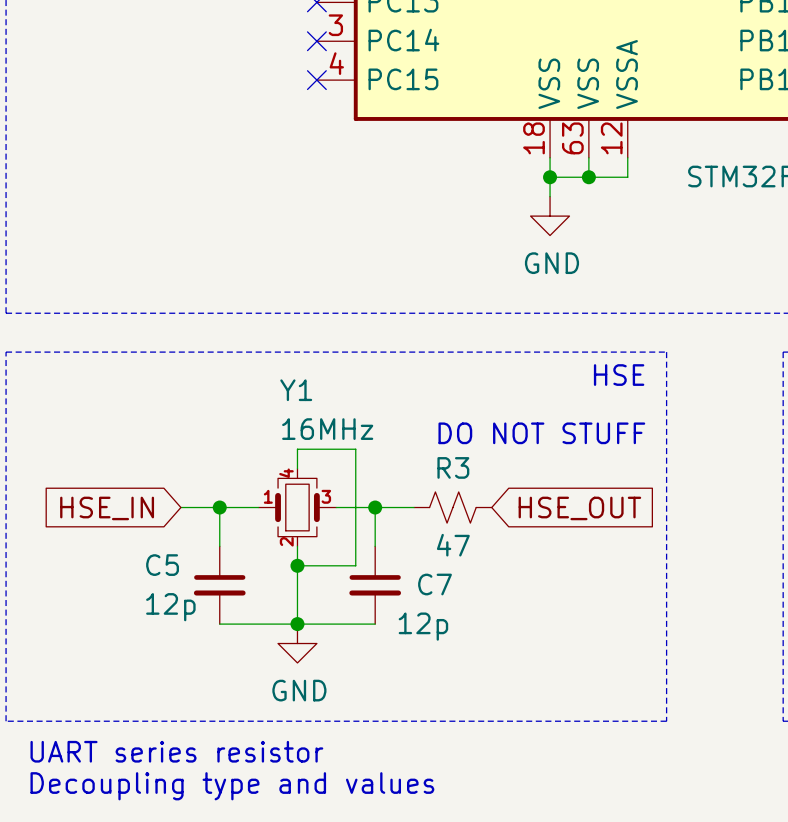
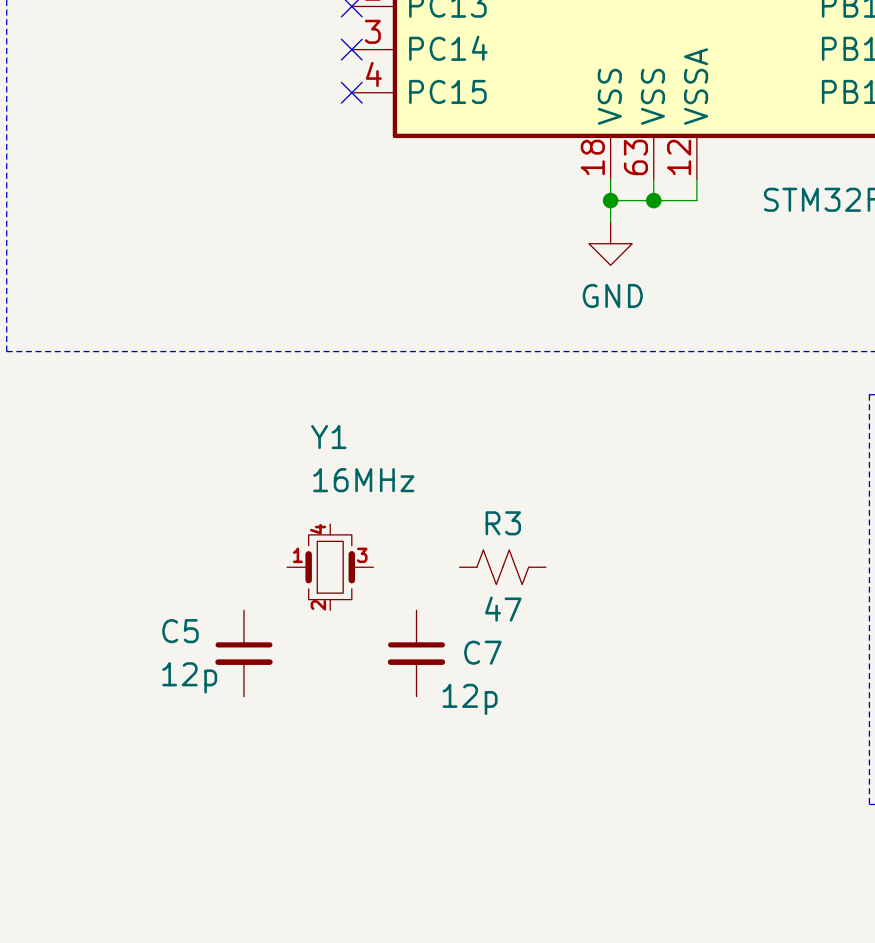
line: (6, 352) (6, 721) (666, 721) (666, 352) (6, 352) -> none
text: HSE (619, 375) -> none
text: DO NOT STUFF (541, 433) -> none
wire: (297, 468) (297, 449) (355, 449) (355, 565) (297, 565) -> none
wire: (180, 507) (258, 507) -> none
wire: (219, 507) (219, 546) -> none
junction: (219, 507) -> none
wire: (336, 507) (414, 507) -> none
wire: (375, 507) (375, 546) -> none
junction: (375, 507) -> none
global label: HSE_IN (107, 508) -> none
global label: HSE_OUT (579, 508) -> none
wire: (297, 546) (297, 624) -> none
junction: (297, 565) -> none
wire: (219, 624) (375, 624) -> none
junction: (297, 624) -> none
power symbol: GND (297, 643) -> none
text: UART series resistor (176, 751) -> none
text: Decoupling type and values (232, 786) -> none

